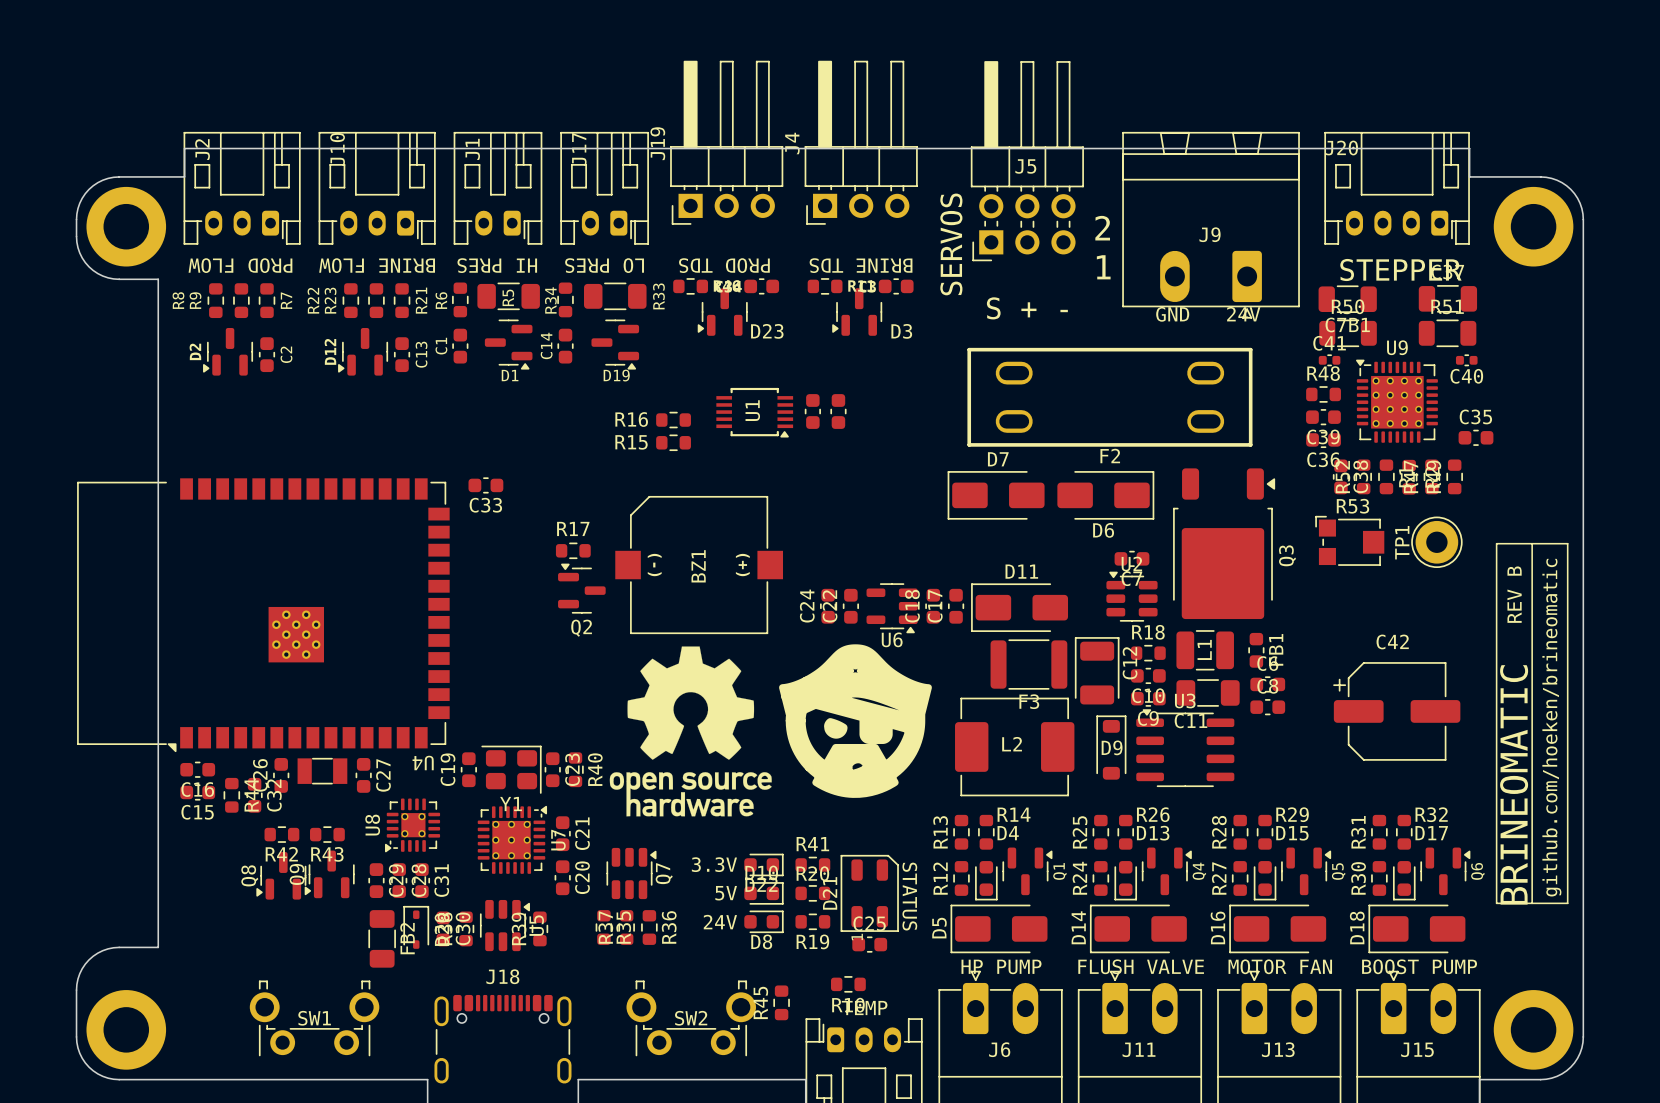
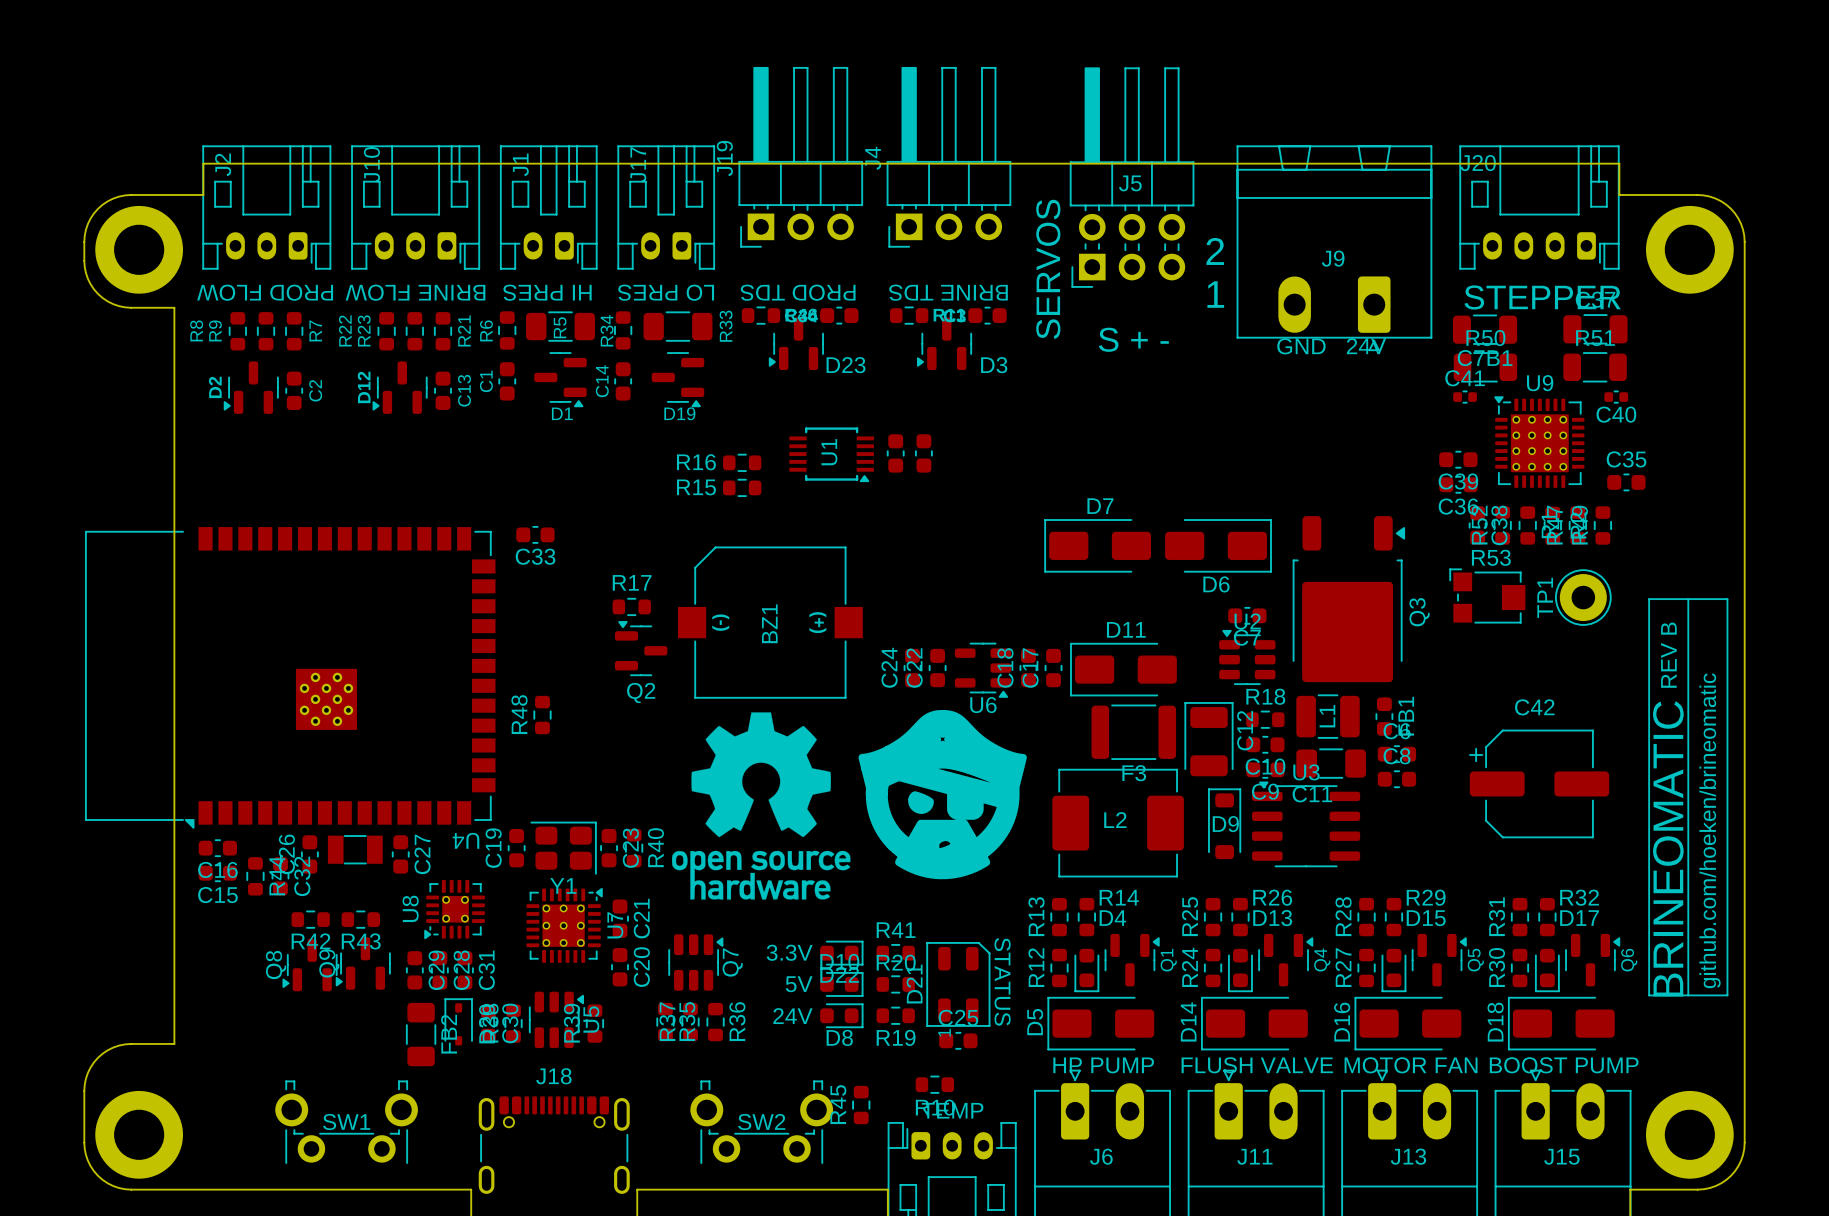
R48 name position: R48 (1323, 373) -> R48 (519, 714)
R48 rotation: 0° (1323, 394) -> 90° clockwise (542, 715)
R48 position: (1323, 394) -> (542, 715)
F2: (1109, 397) -> none

